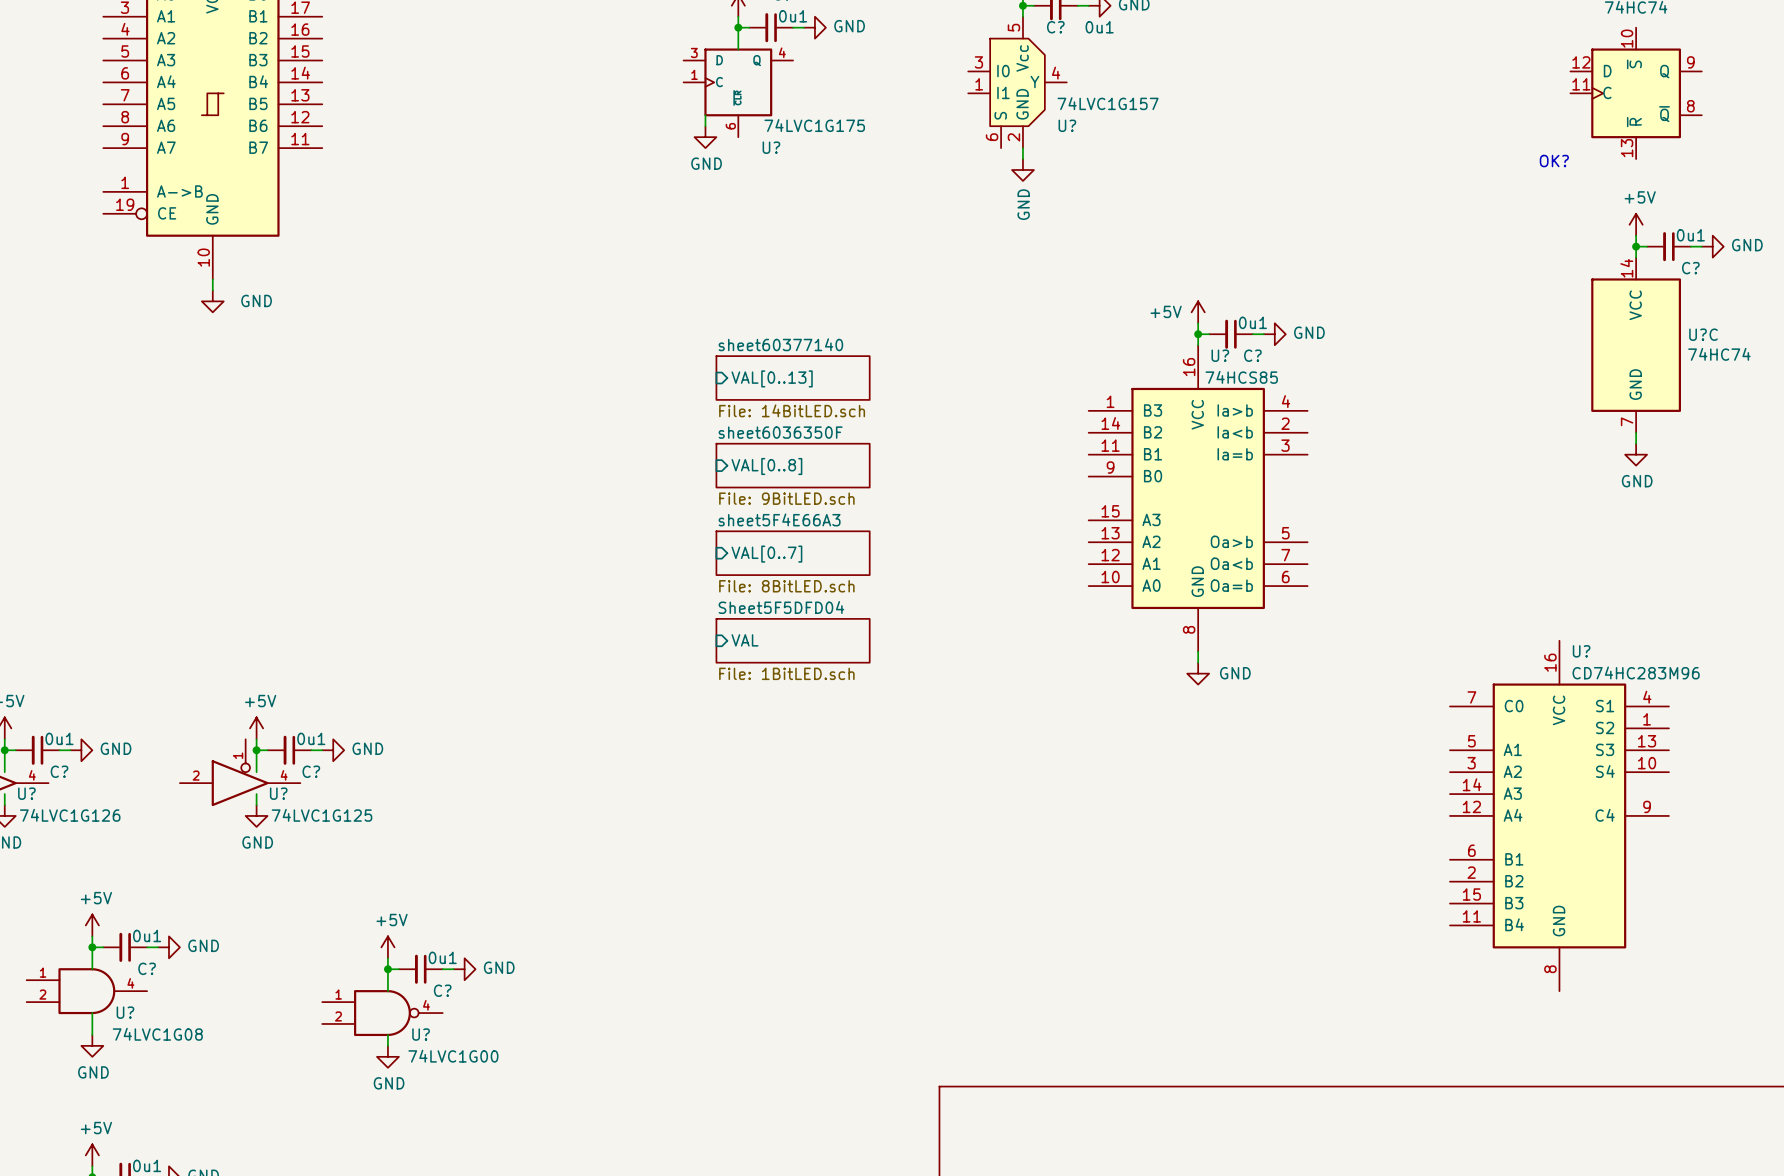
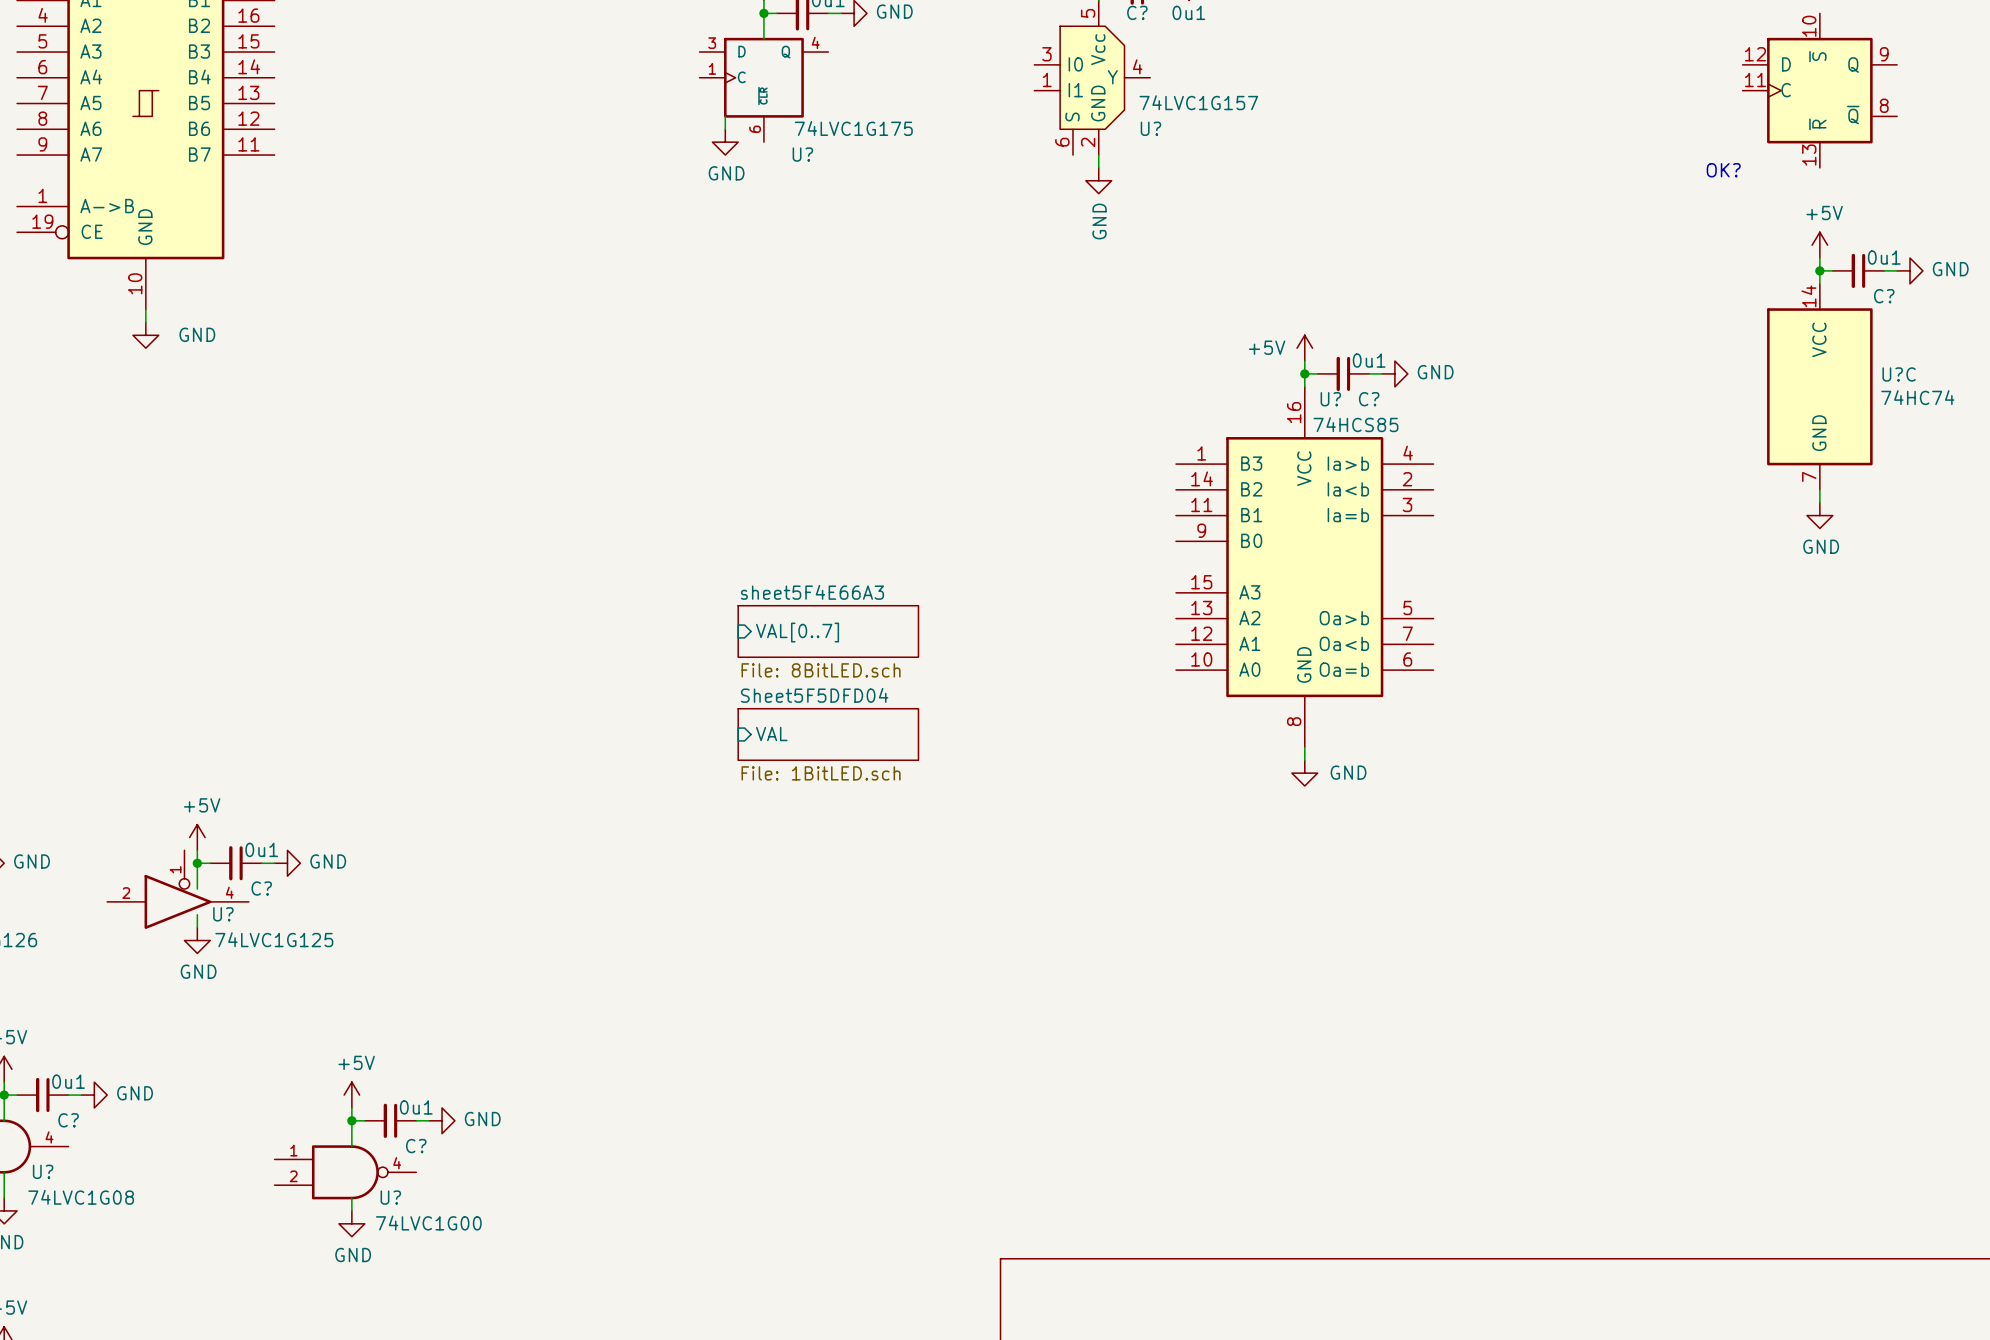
sheet pin: VAL[0..13] (772, 378) -> none
sheet sheet60377140: File: 14BitLED.sch (793, 378) -> none
sheet sheet6036350F: File: 9BitLED.sch (793, 465) -> none
sheet pin: VAL[0..8] (766, 466) -> none
U?: CD74HC283M96 (1559, 815) -> none

